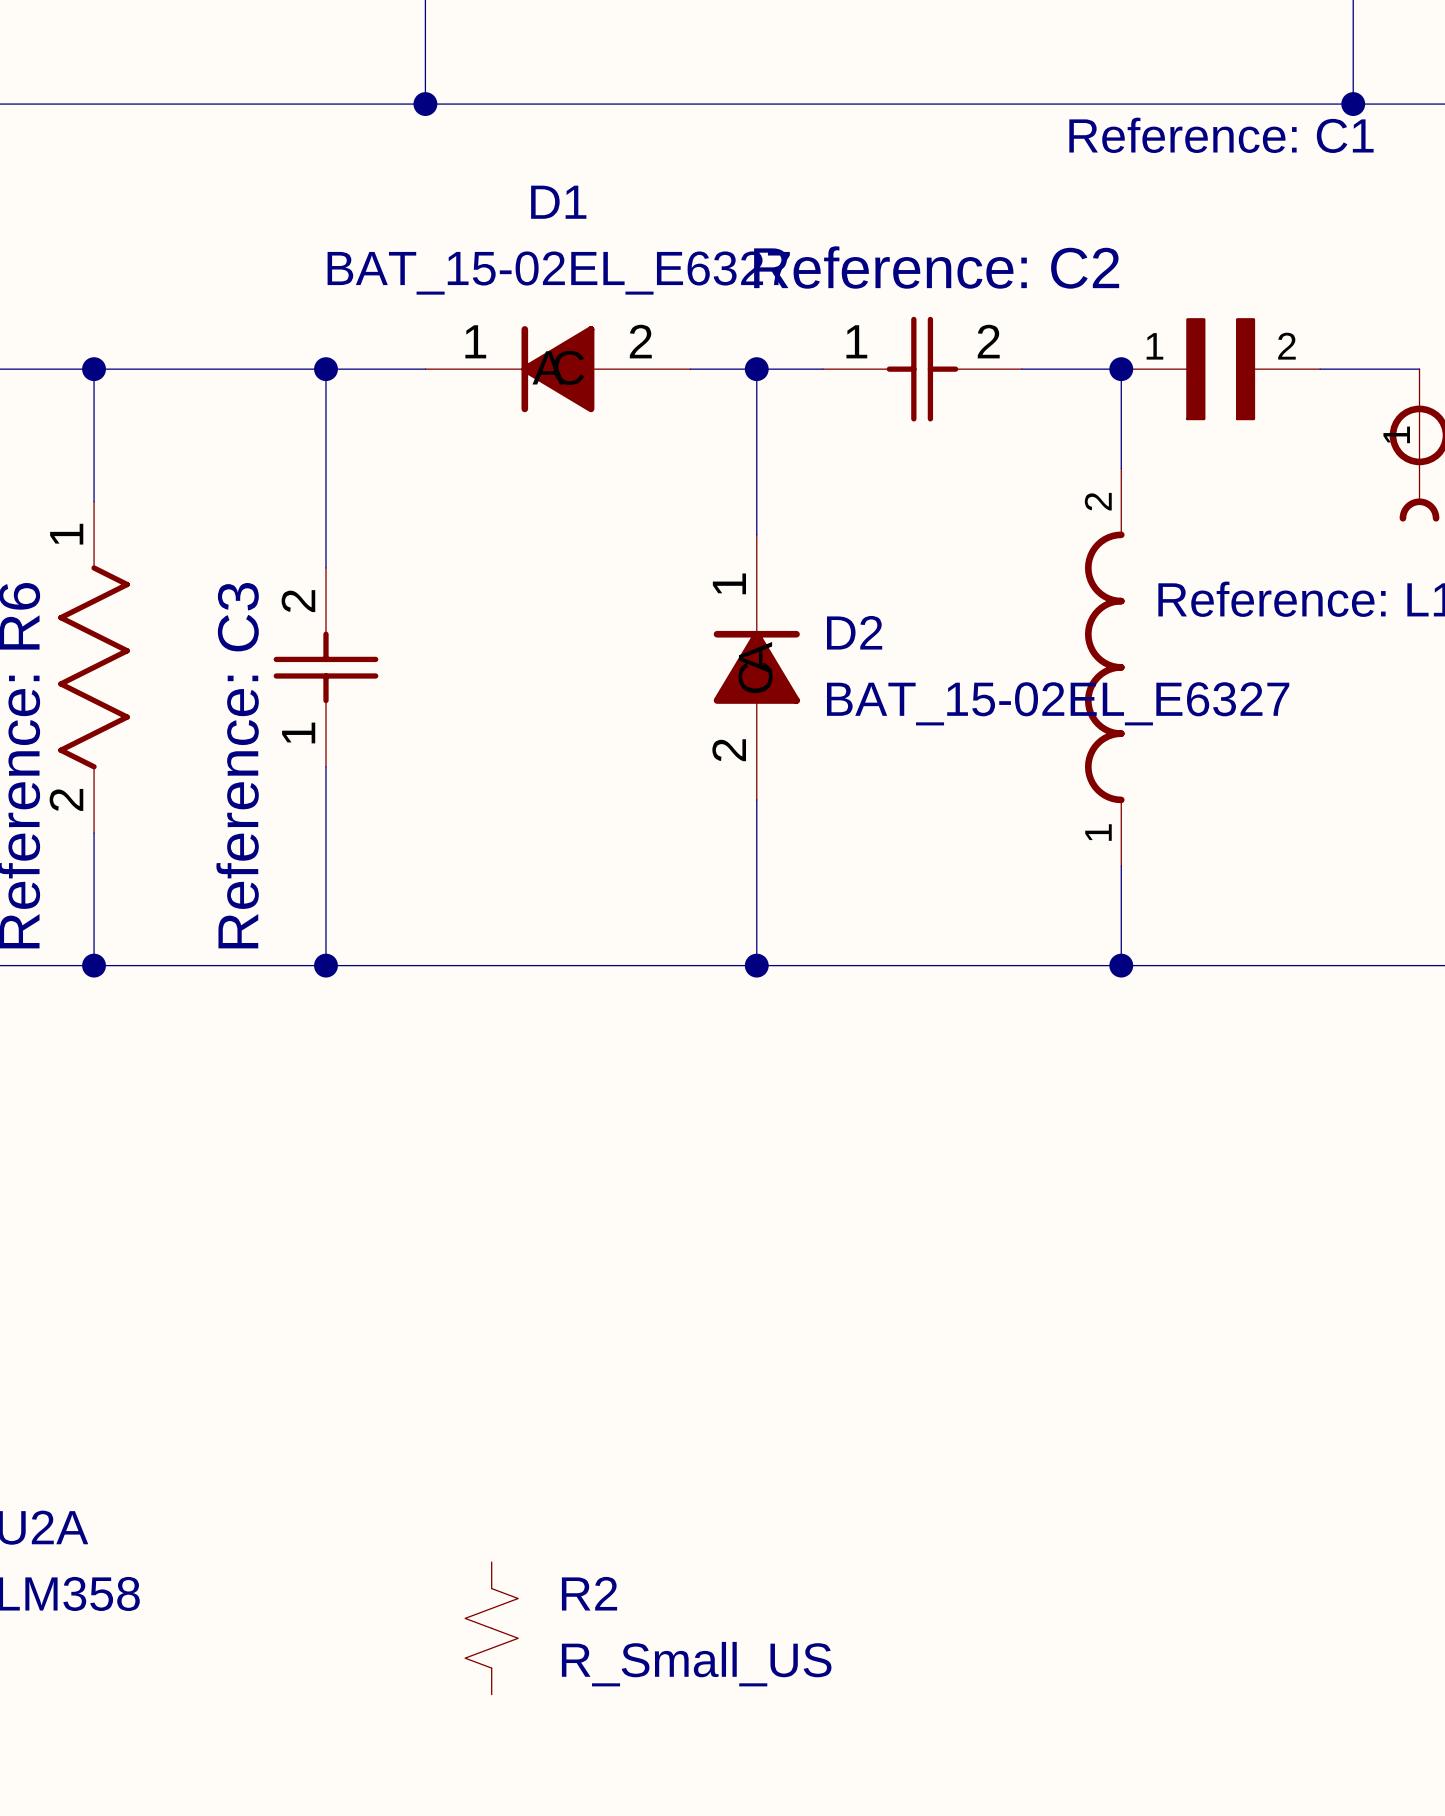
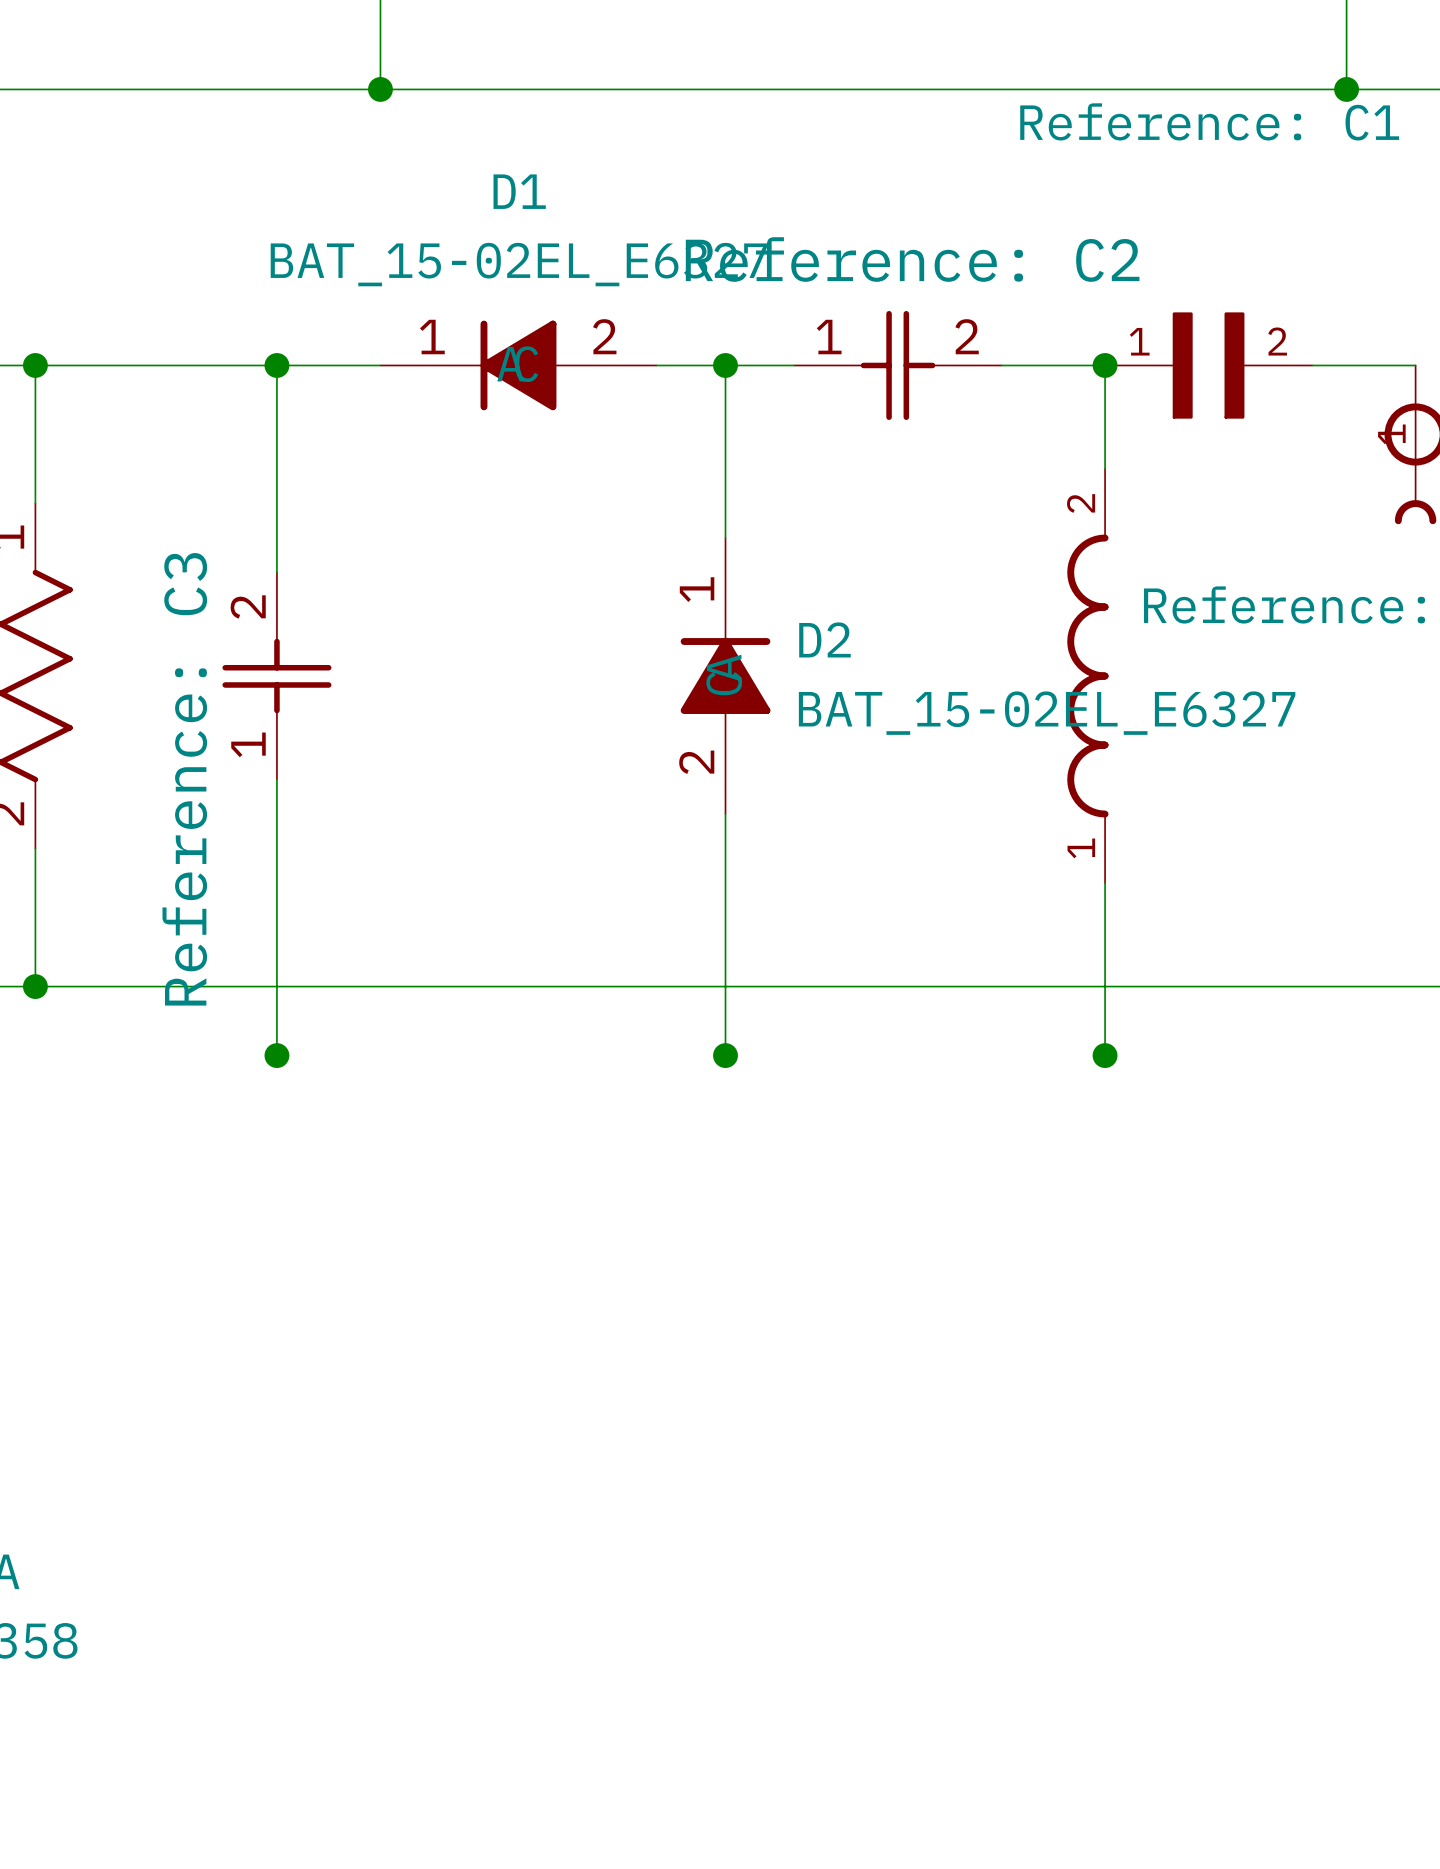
wire: none -> (276, 986) (276, 1055)
junction position: (325, 965) -> (276, 1055)
wire: none -> (725, 986) (725, 1055)
junction position: (756, 965) -> (725, 1055)
wire: none -> (1105, 986) (1105, 1055)
junction position: (1121, 965) -> (1105, 1055)
R2: R_Small_US (491, 1628) -> none

